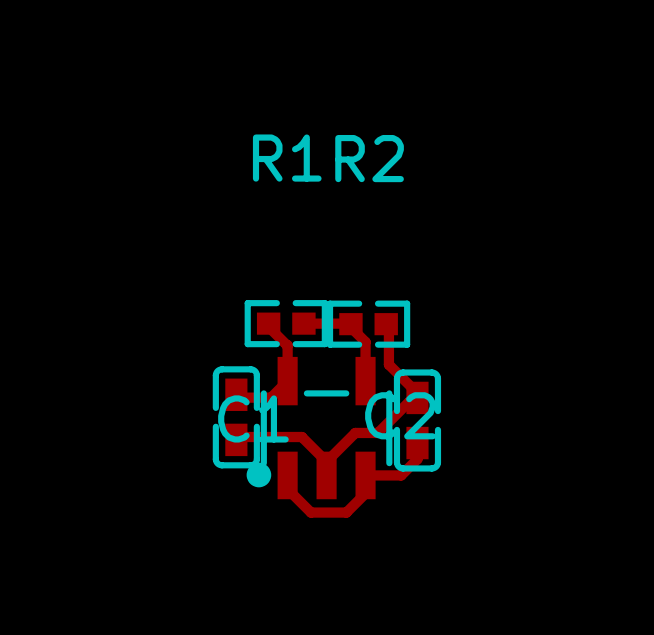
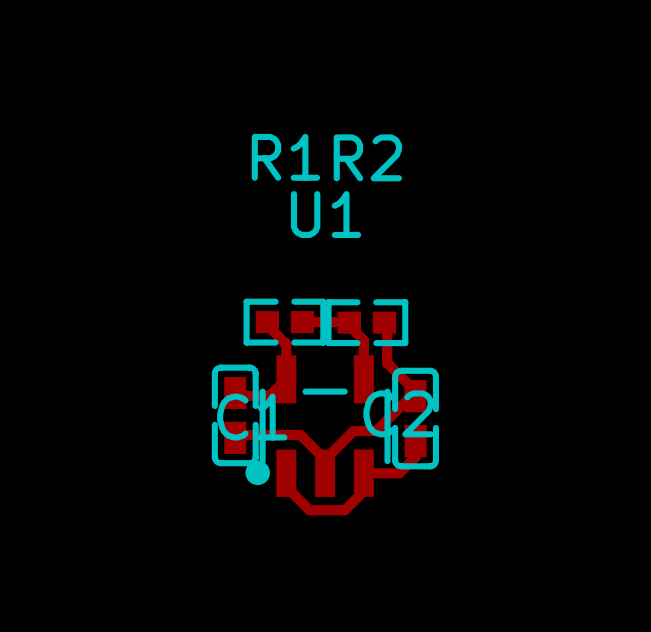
U1 name: none -> U1 (326, 214)

